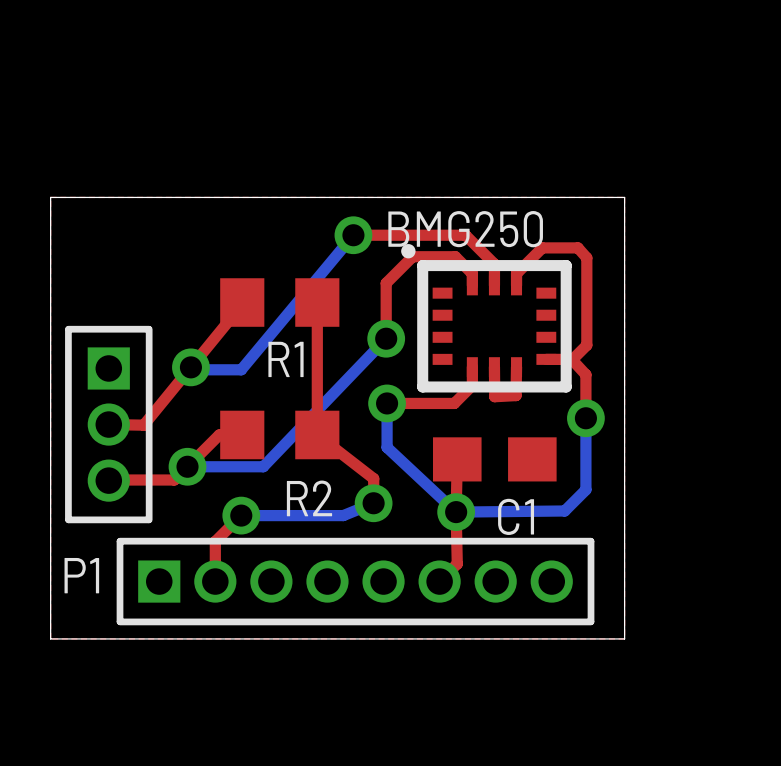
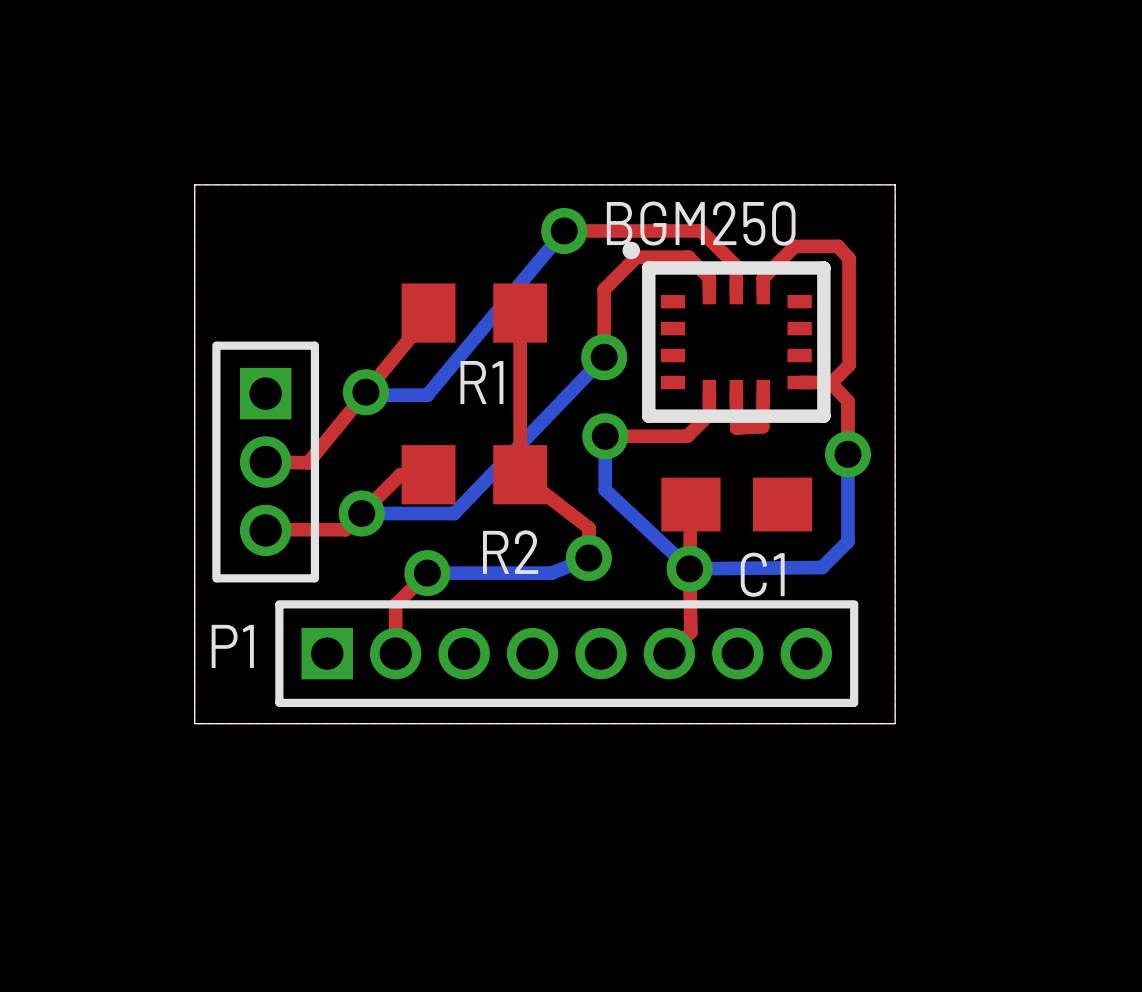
part value: BMG250 (465, 229) -> BGM250 (701, 223)

